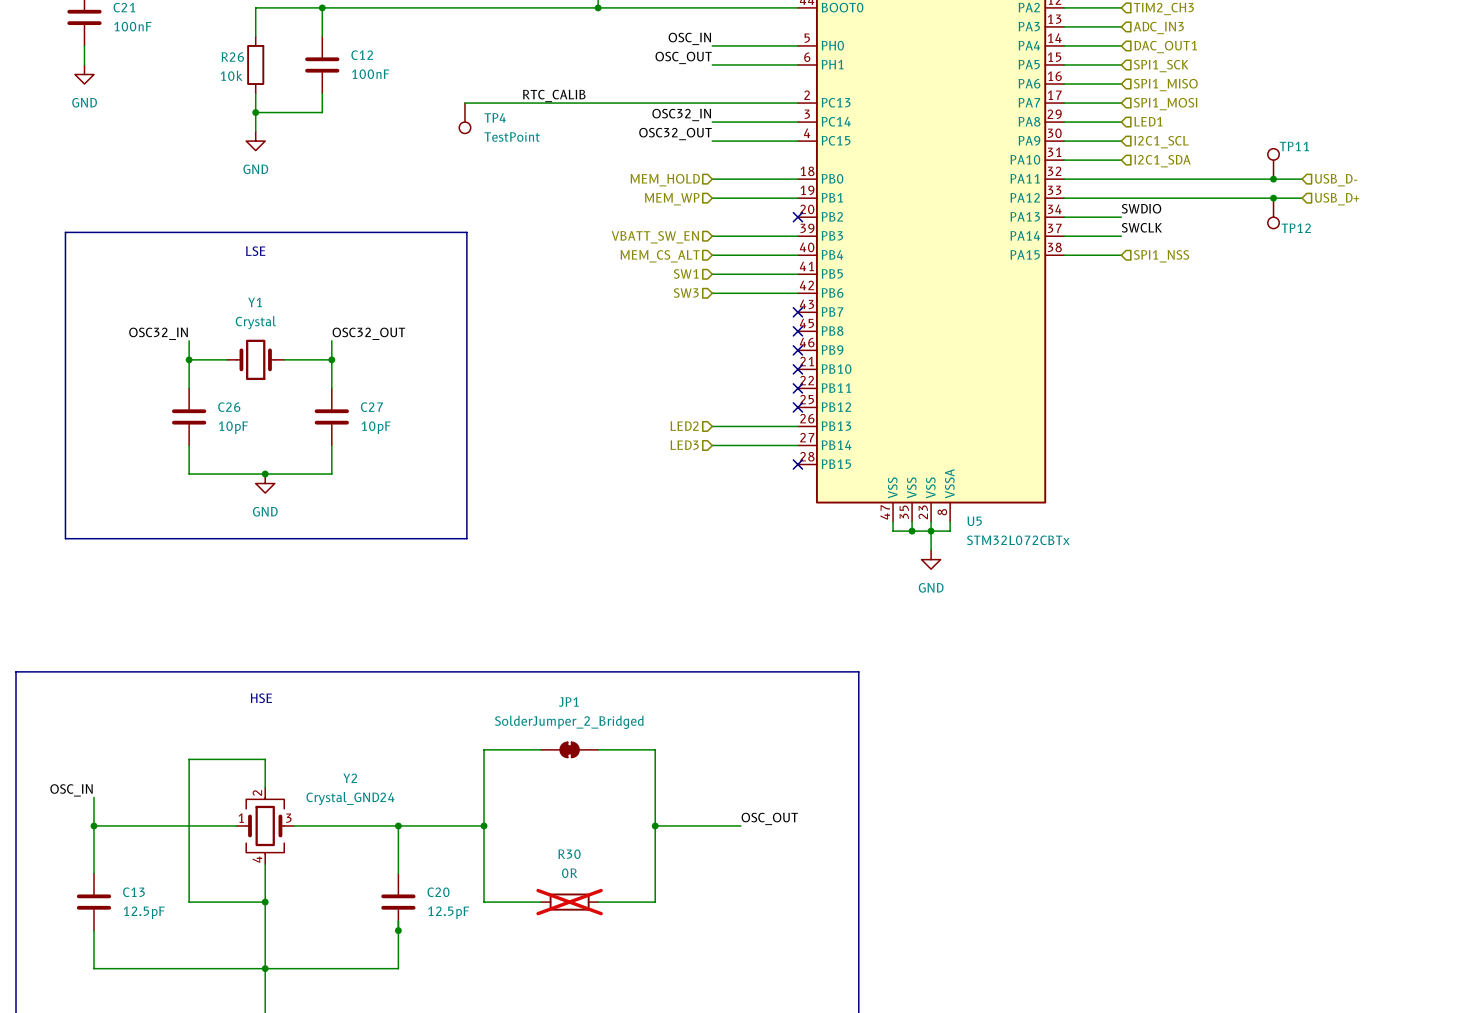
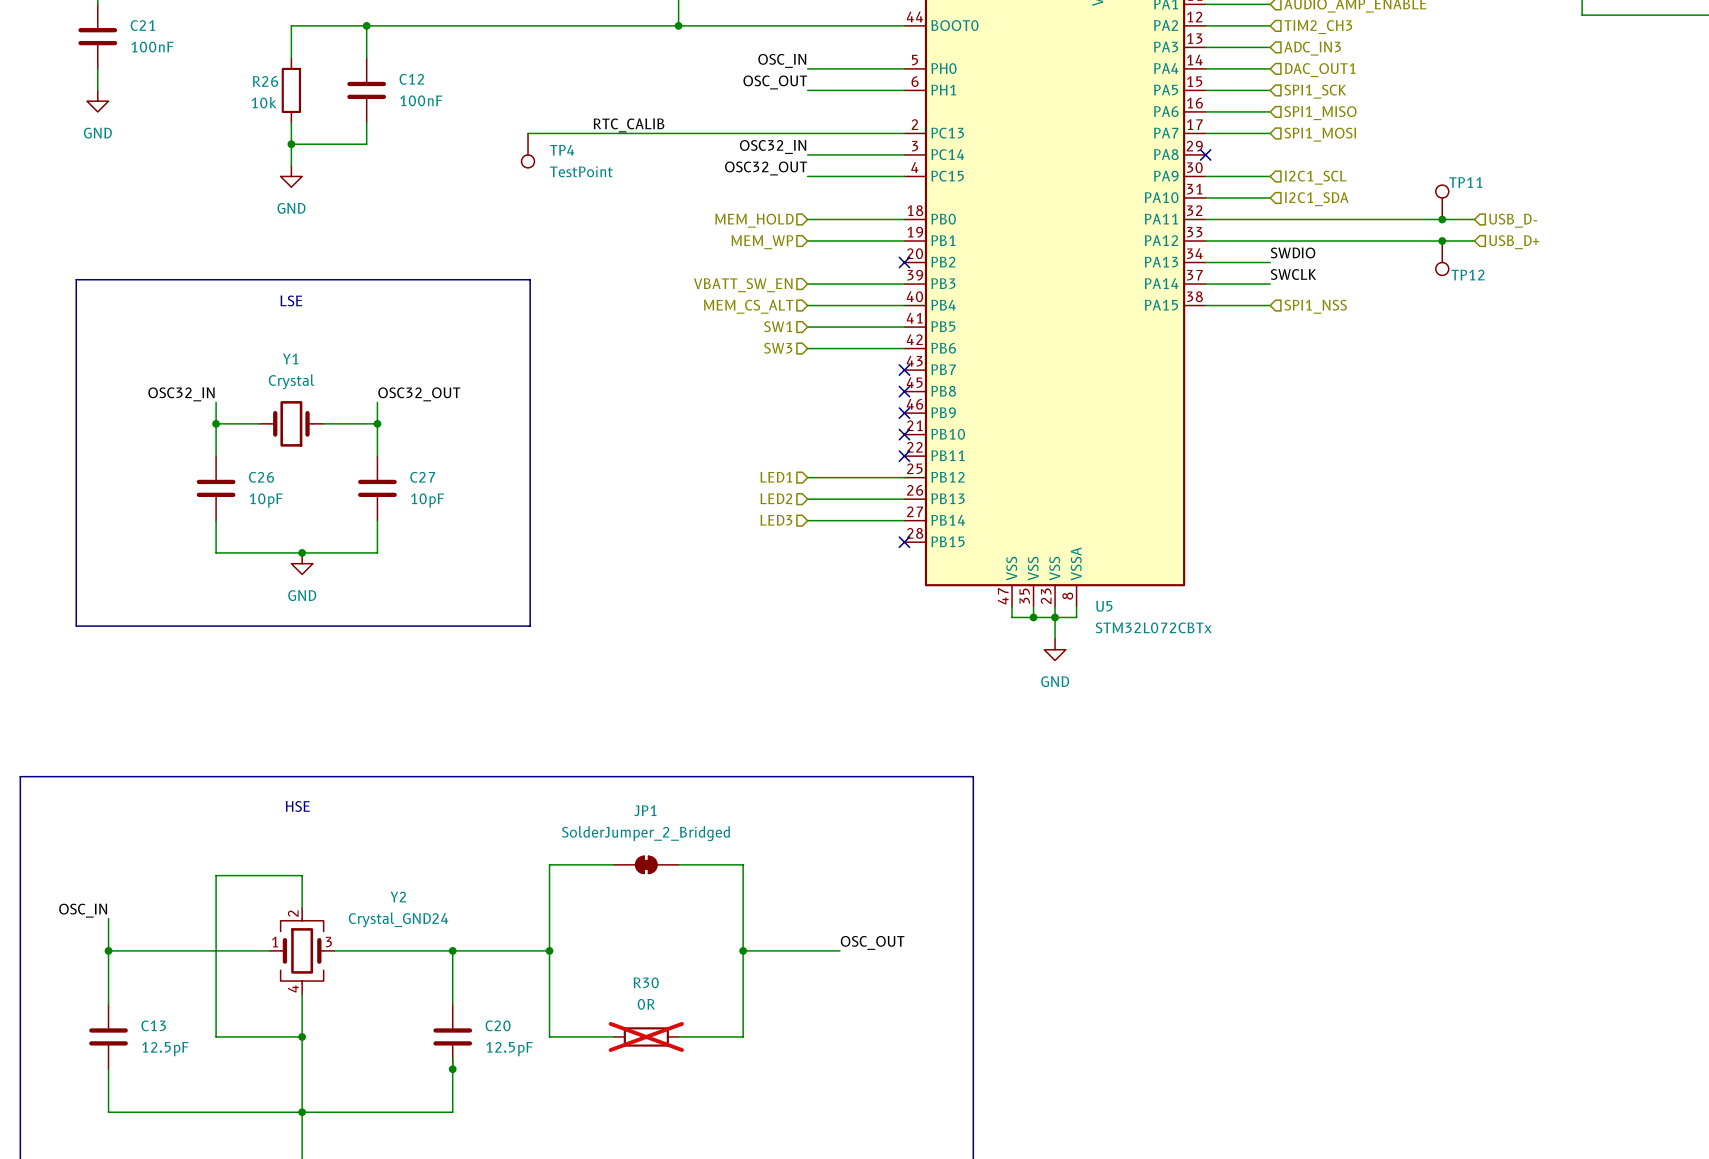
hierarchical label: LED1 (1148, 121) -> none
wire: (1064, 122) (1121, 122) -> none
no-connect mark: none -> (1205, 154)
hierarchical label: none -> LED1 (776, 477)
wire: none -> (807, 477) (904, 477)
no-connect mark: (797, 407) -> none

